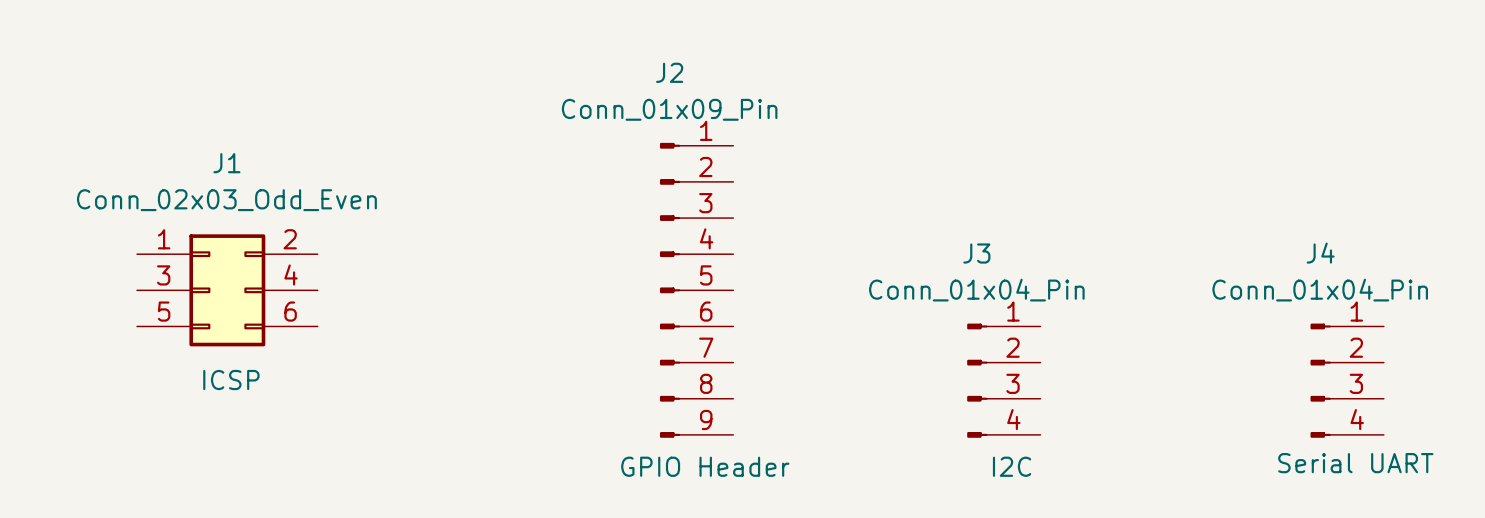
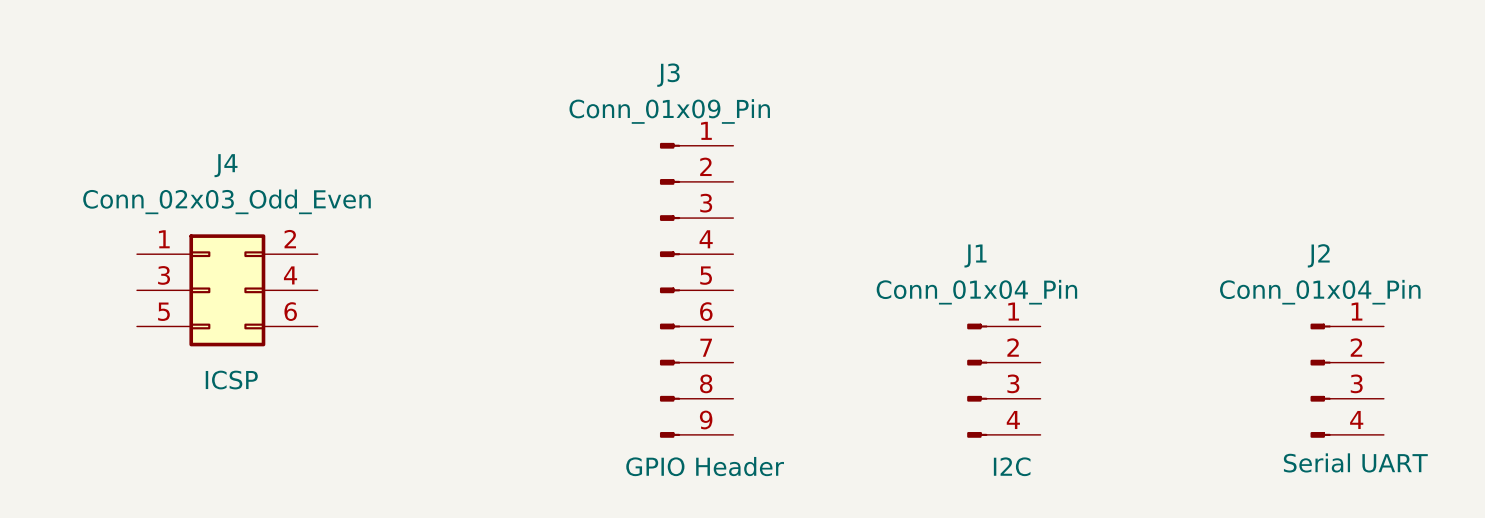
J2 name: J2 (669, 72) -> J3 (668, 75)
J1 name: J1 (226, 163) -> J4 (226, 165)
J3 name: J3 (976, 253) -> J1 (975, 255)
J4 name: J4 (1320, 253) -> J2 (1318, 255)

